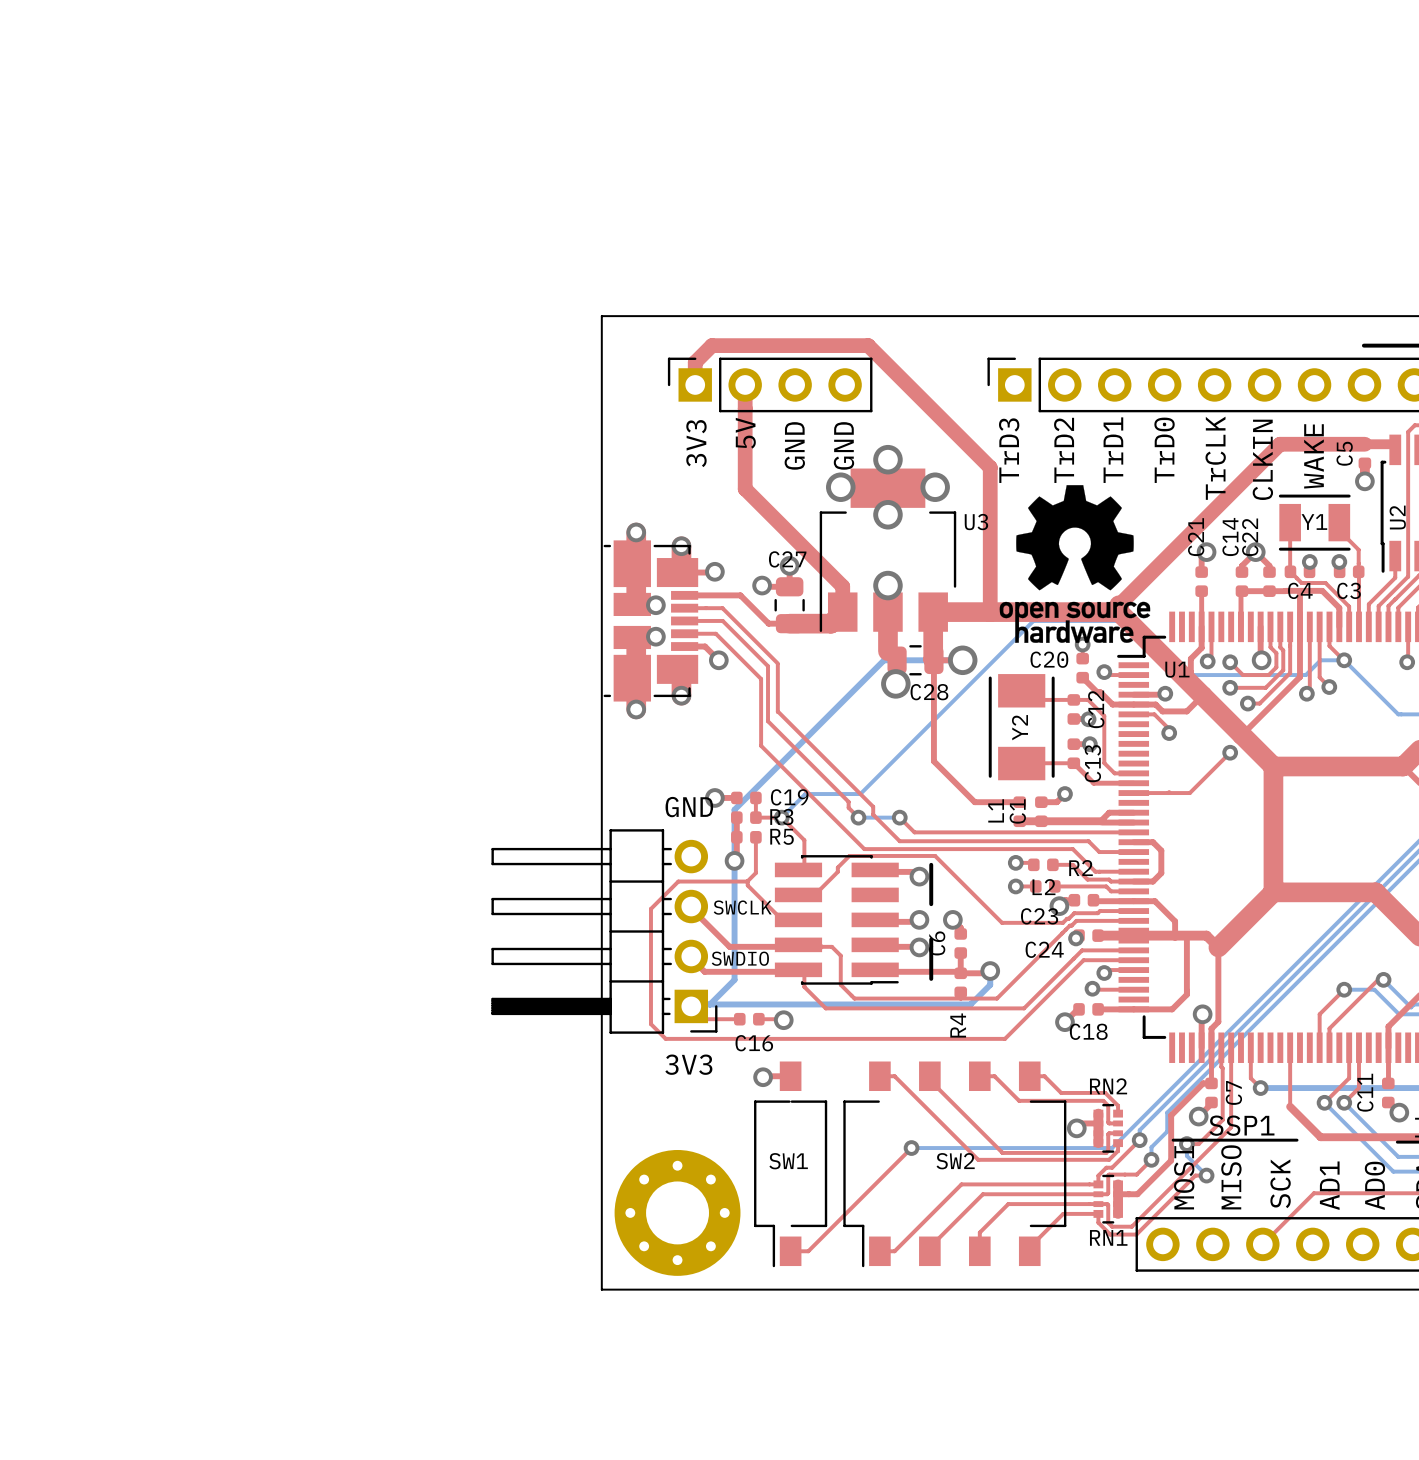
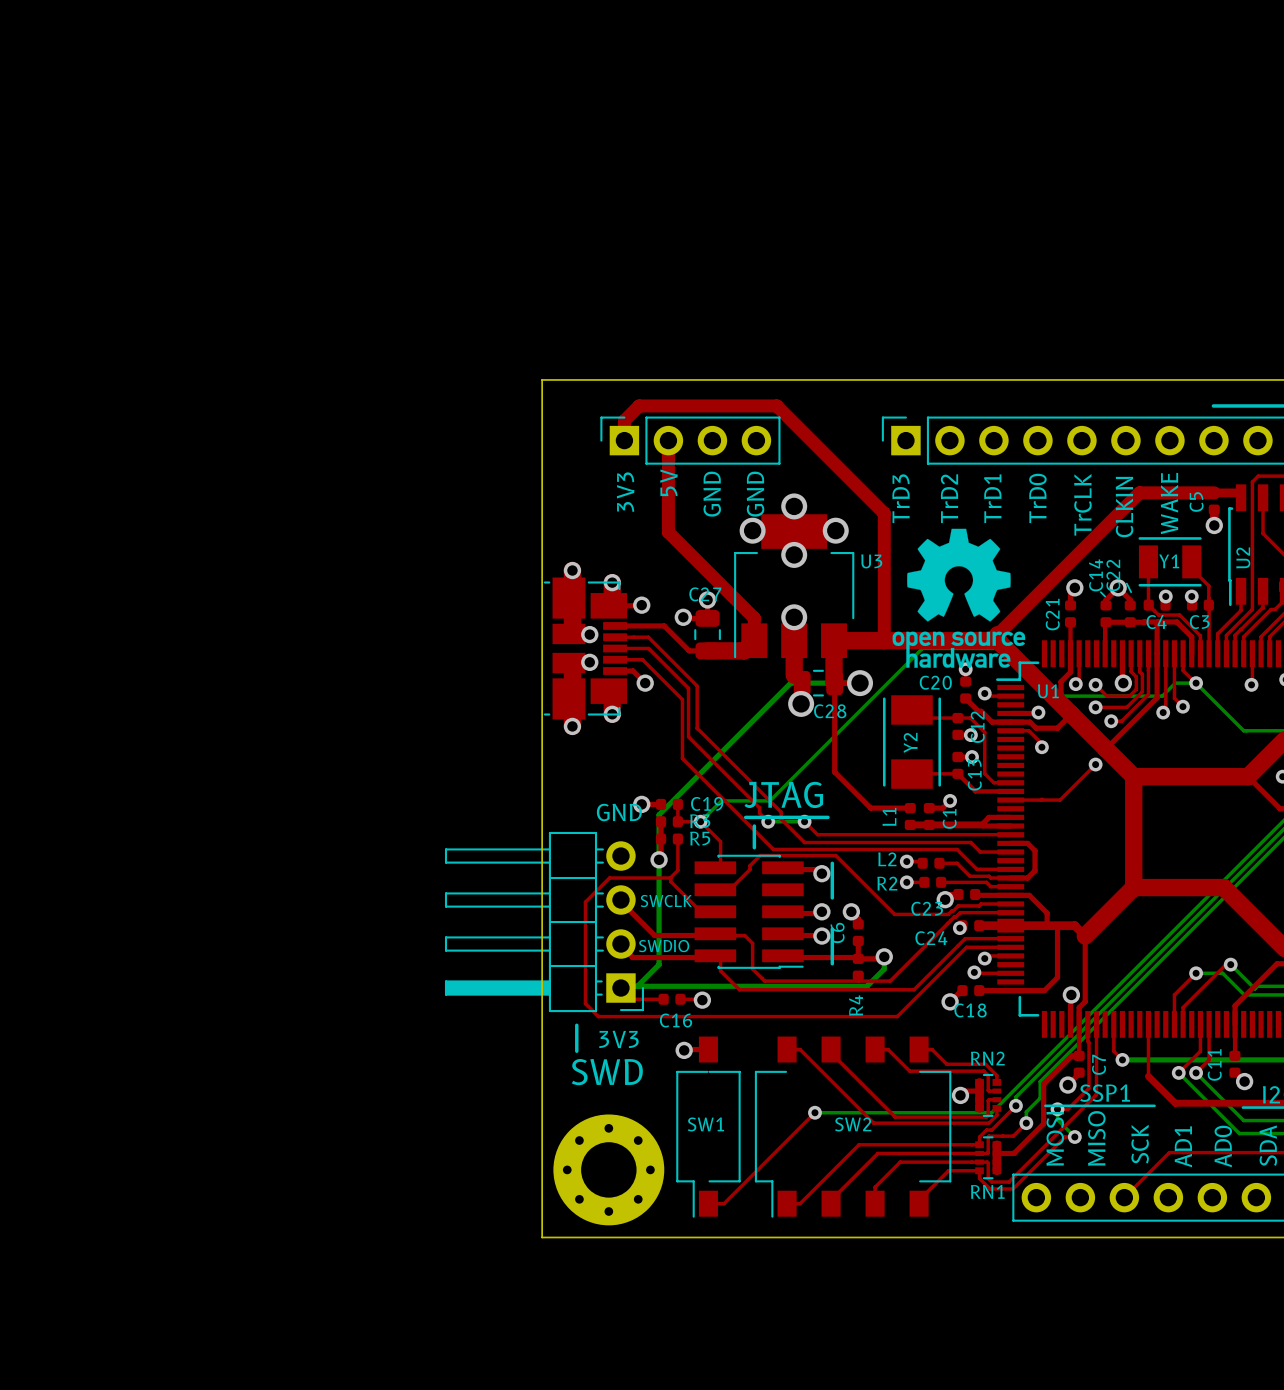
C21 name position: C21 (1196, 537) -> C21 (1052, 614)
line: none -> (1126, 583) (1131, 592)
line: none -> (1100, 592) (1105, 596)
text: none -> JTAG (783, 794)
C1 name position: C1 (1017, 811) -> C1 (949, 818)
line: none -> (745, 817) (827, 817)
line: none -> (754, 826) (754, 847)
R2 name position: R2 (1081, 868) -> R2 (887, 883)
L2 name position: L2 (1043, 887) -> L2 (887, 859)
line: none -> (576, 1025) (576, 1051)
text: none -> SWD (607, 1072)

